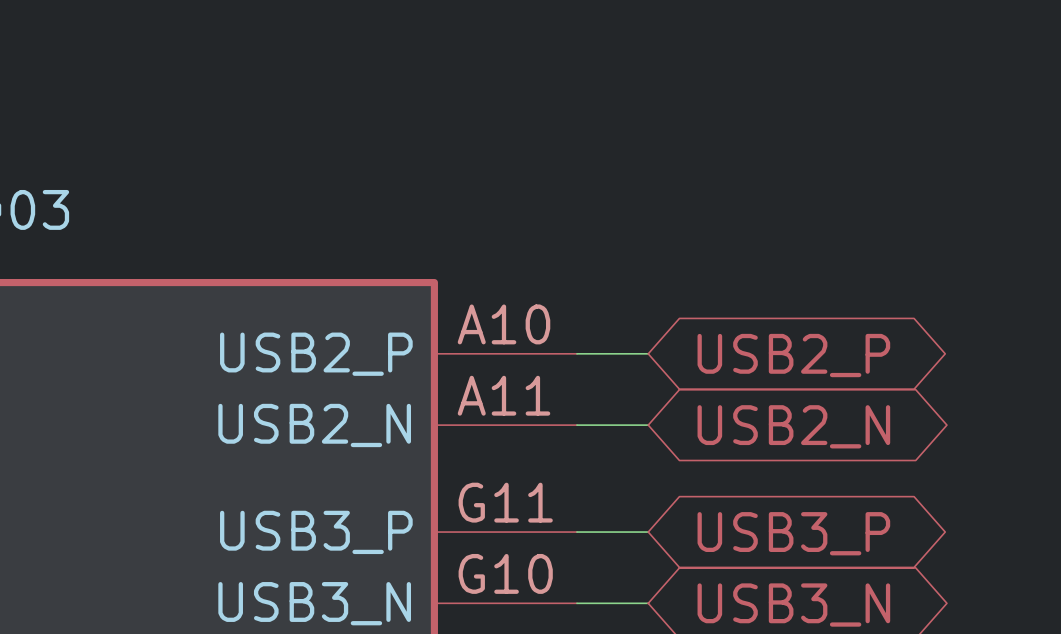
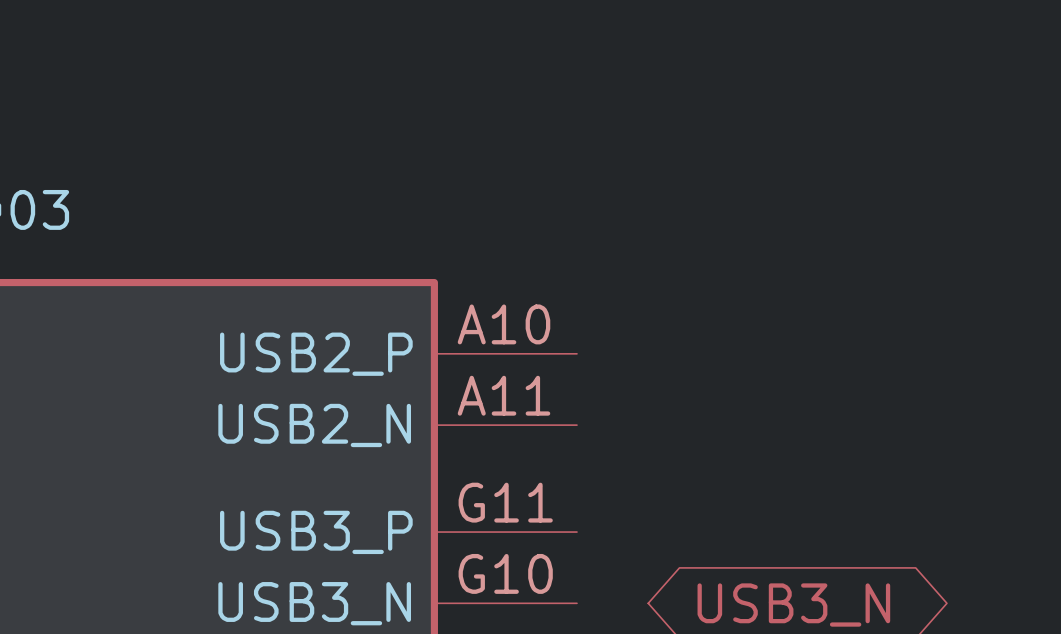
wire: (576, 353) (648, 353) -> none
global label: USB2_P (793, 355) -> none
wire: (576, 425) (648, 425) -> none
global label: USB2_N (793, 426) -> none
wire: (576, 532) (648, 532) -> none
global label: USB3_P (793, 533) -> none
wire: (576, 603) (648, 603) -> none

